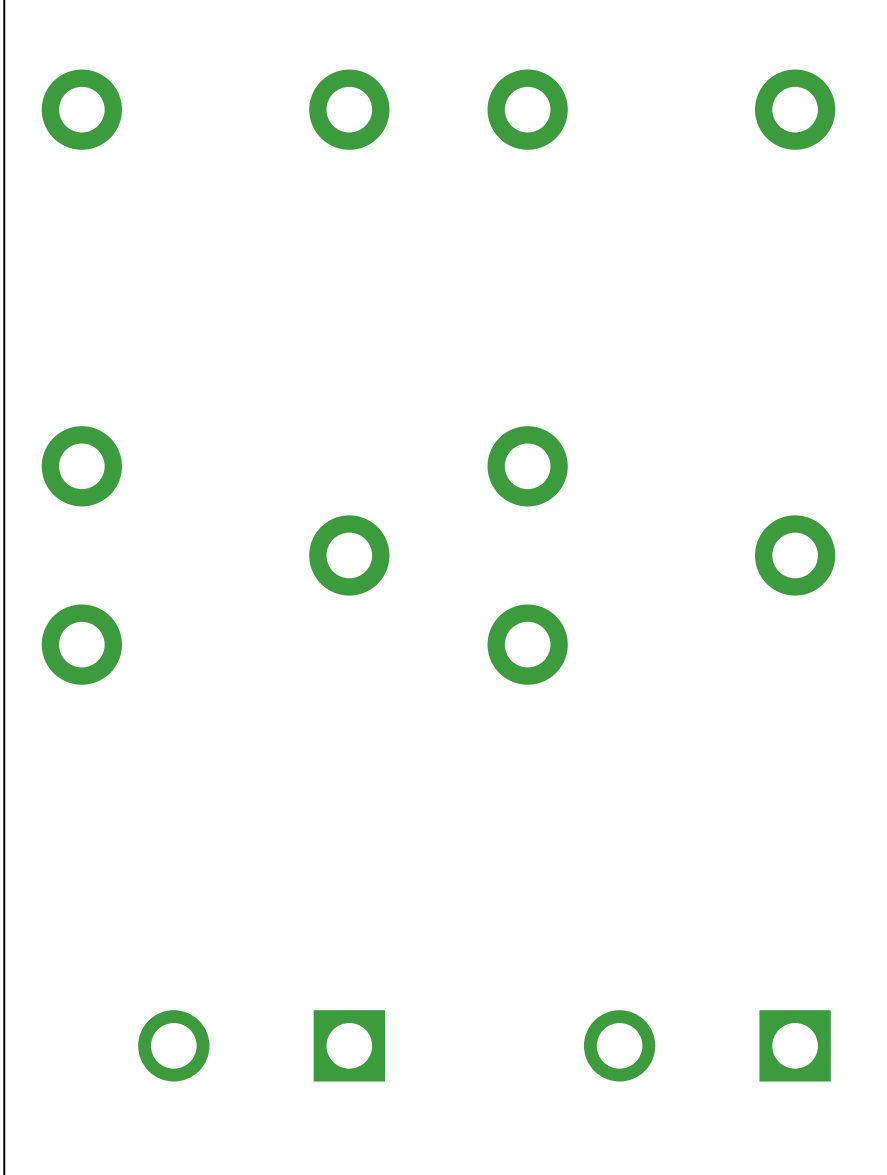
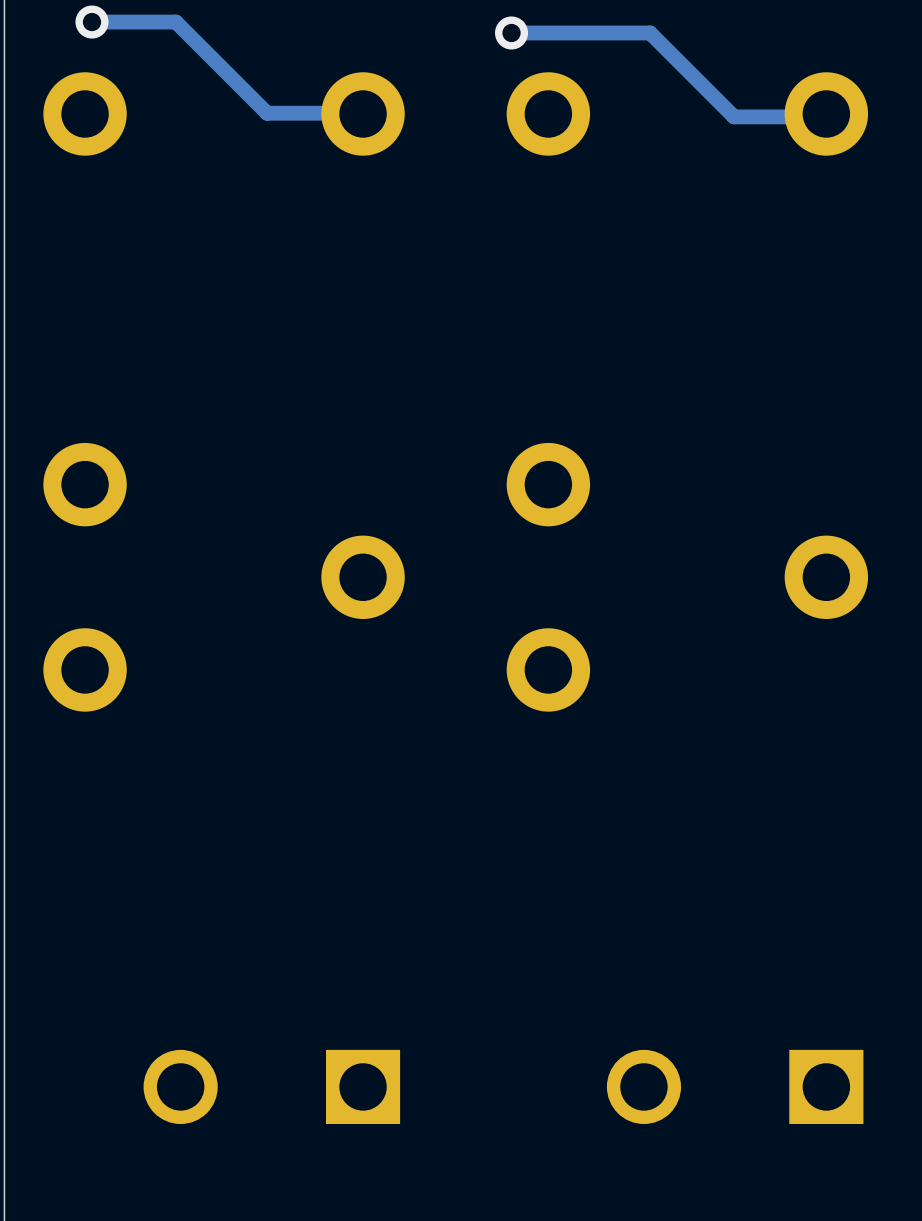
track: none -> (91, 22) (175, 22) (267, 113) (363, 113)
via: none -> (91, 22)
track: none -> (511, 32) (650, 32) (734, 116) (823, 116) (826, 113)
via: none -> (511, 32)

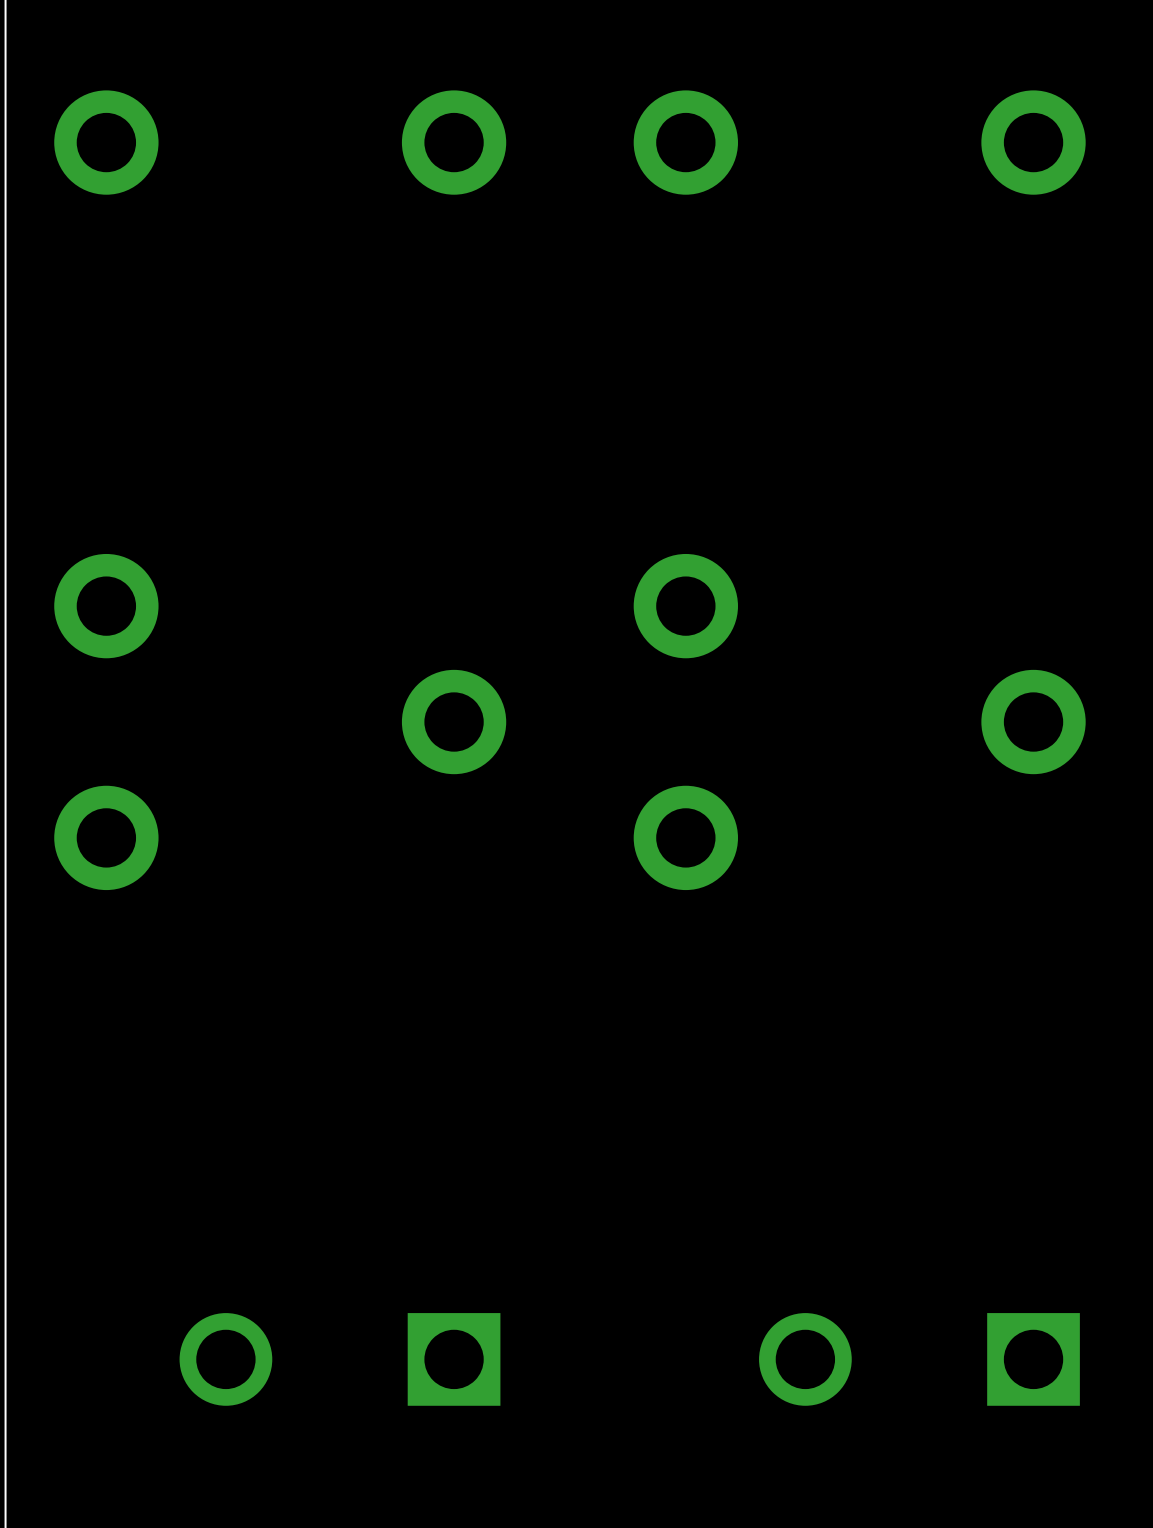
track: (91, 22) (175, 22) (267, 113) (363, 113) -> none
via: (91, 22) -> none
track: (511, 32) (650, 32) (734, 116) (823, 116) (826, 113) -> none
via: (511, 32) -> none

